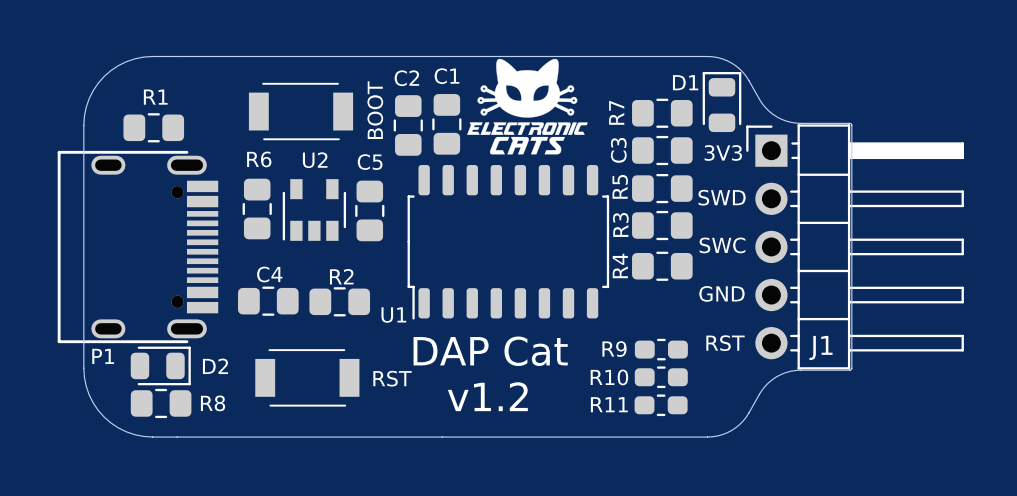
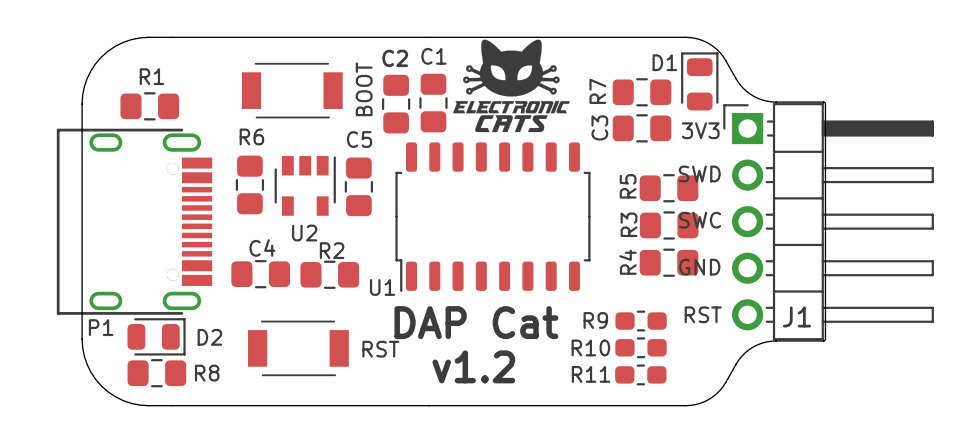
R5 position: (662, 188) -> (669, 188)
U2 rotation: 0° (314, 209) -> 180° (305, 185)
R3 position: (662, 225) -> (669, 225)
R4 position: (662, 266) -> (669, 262)

